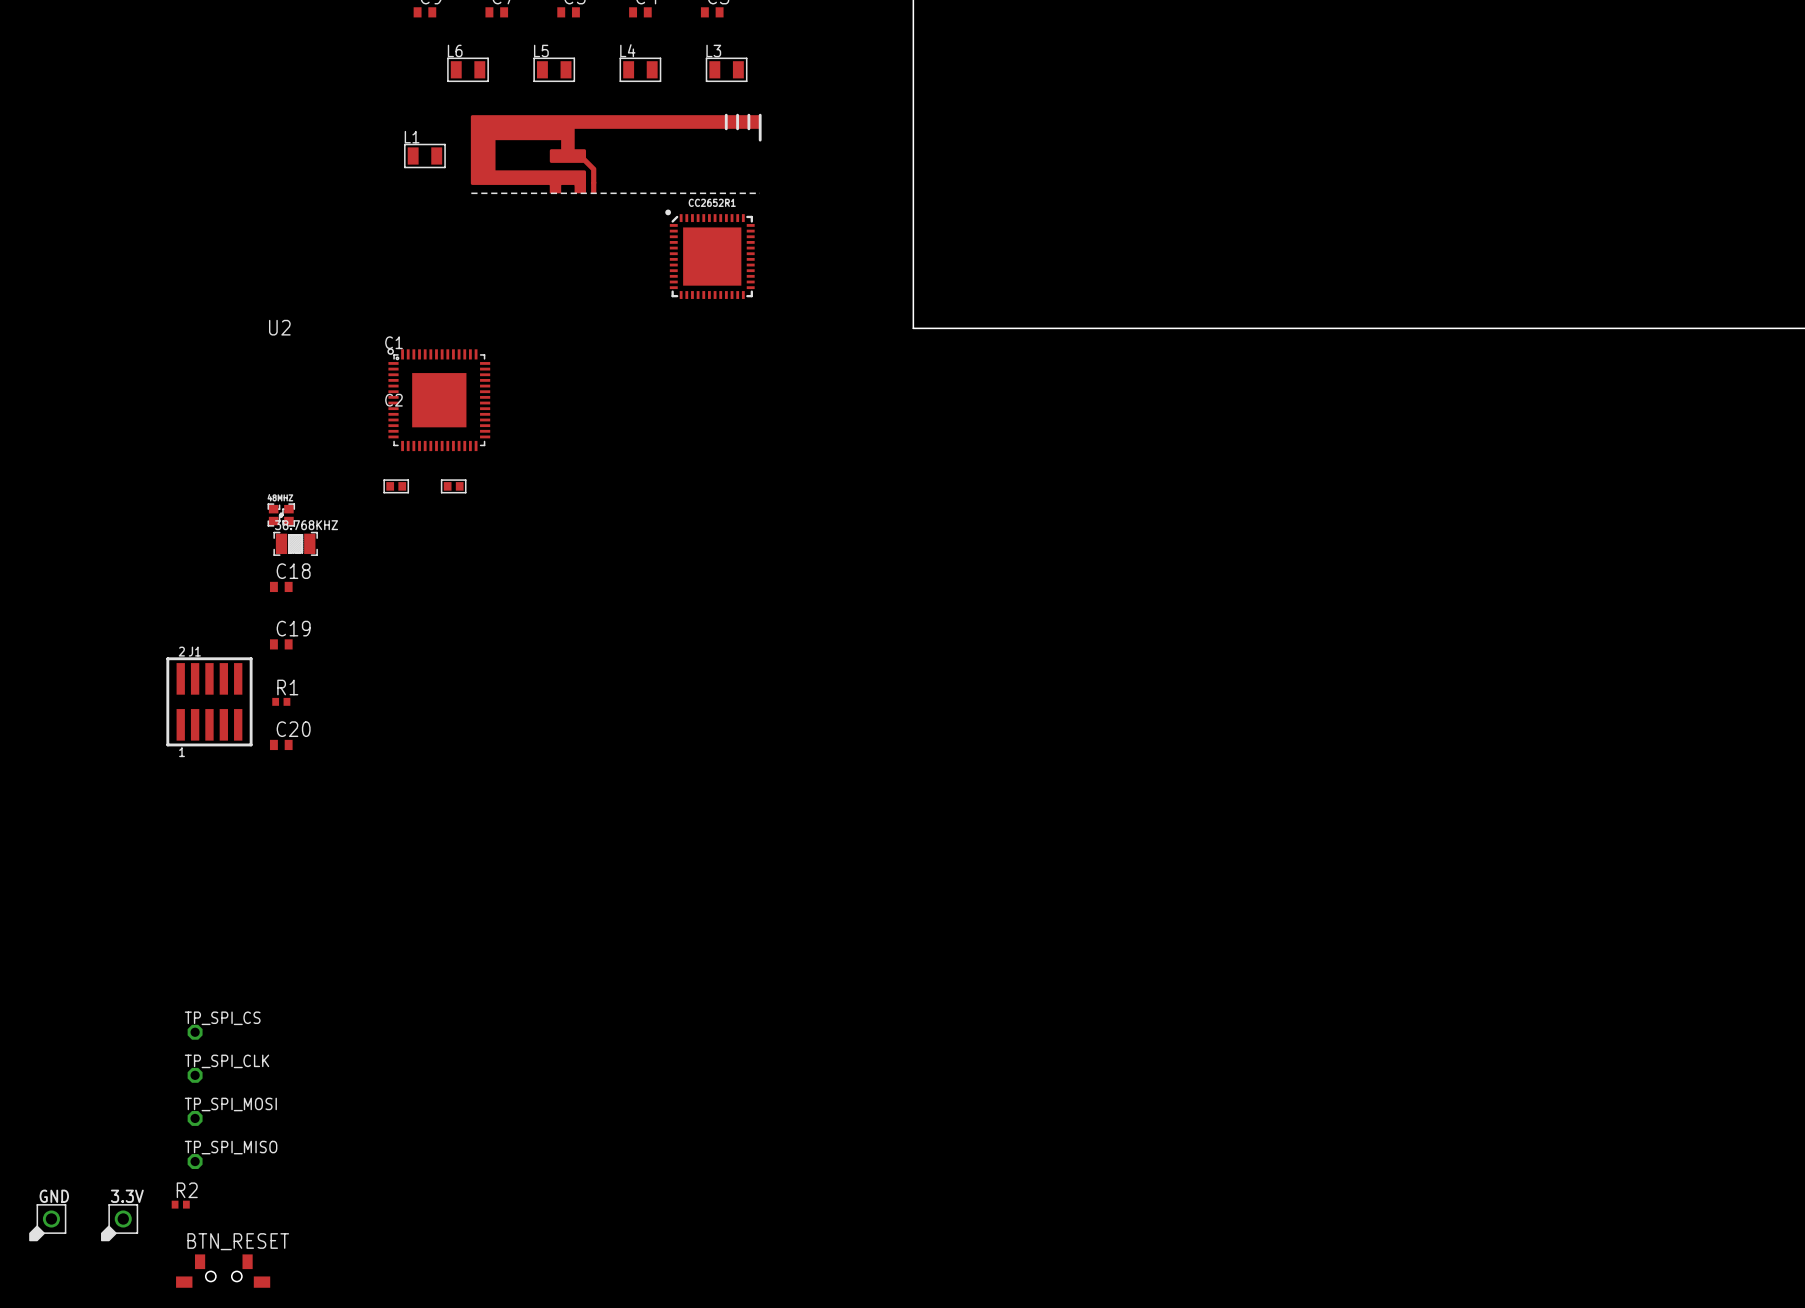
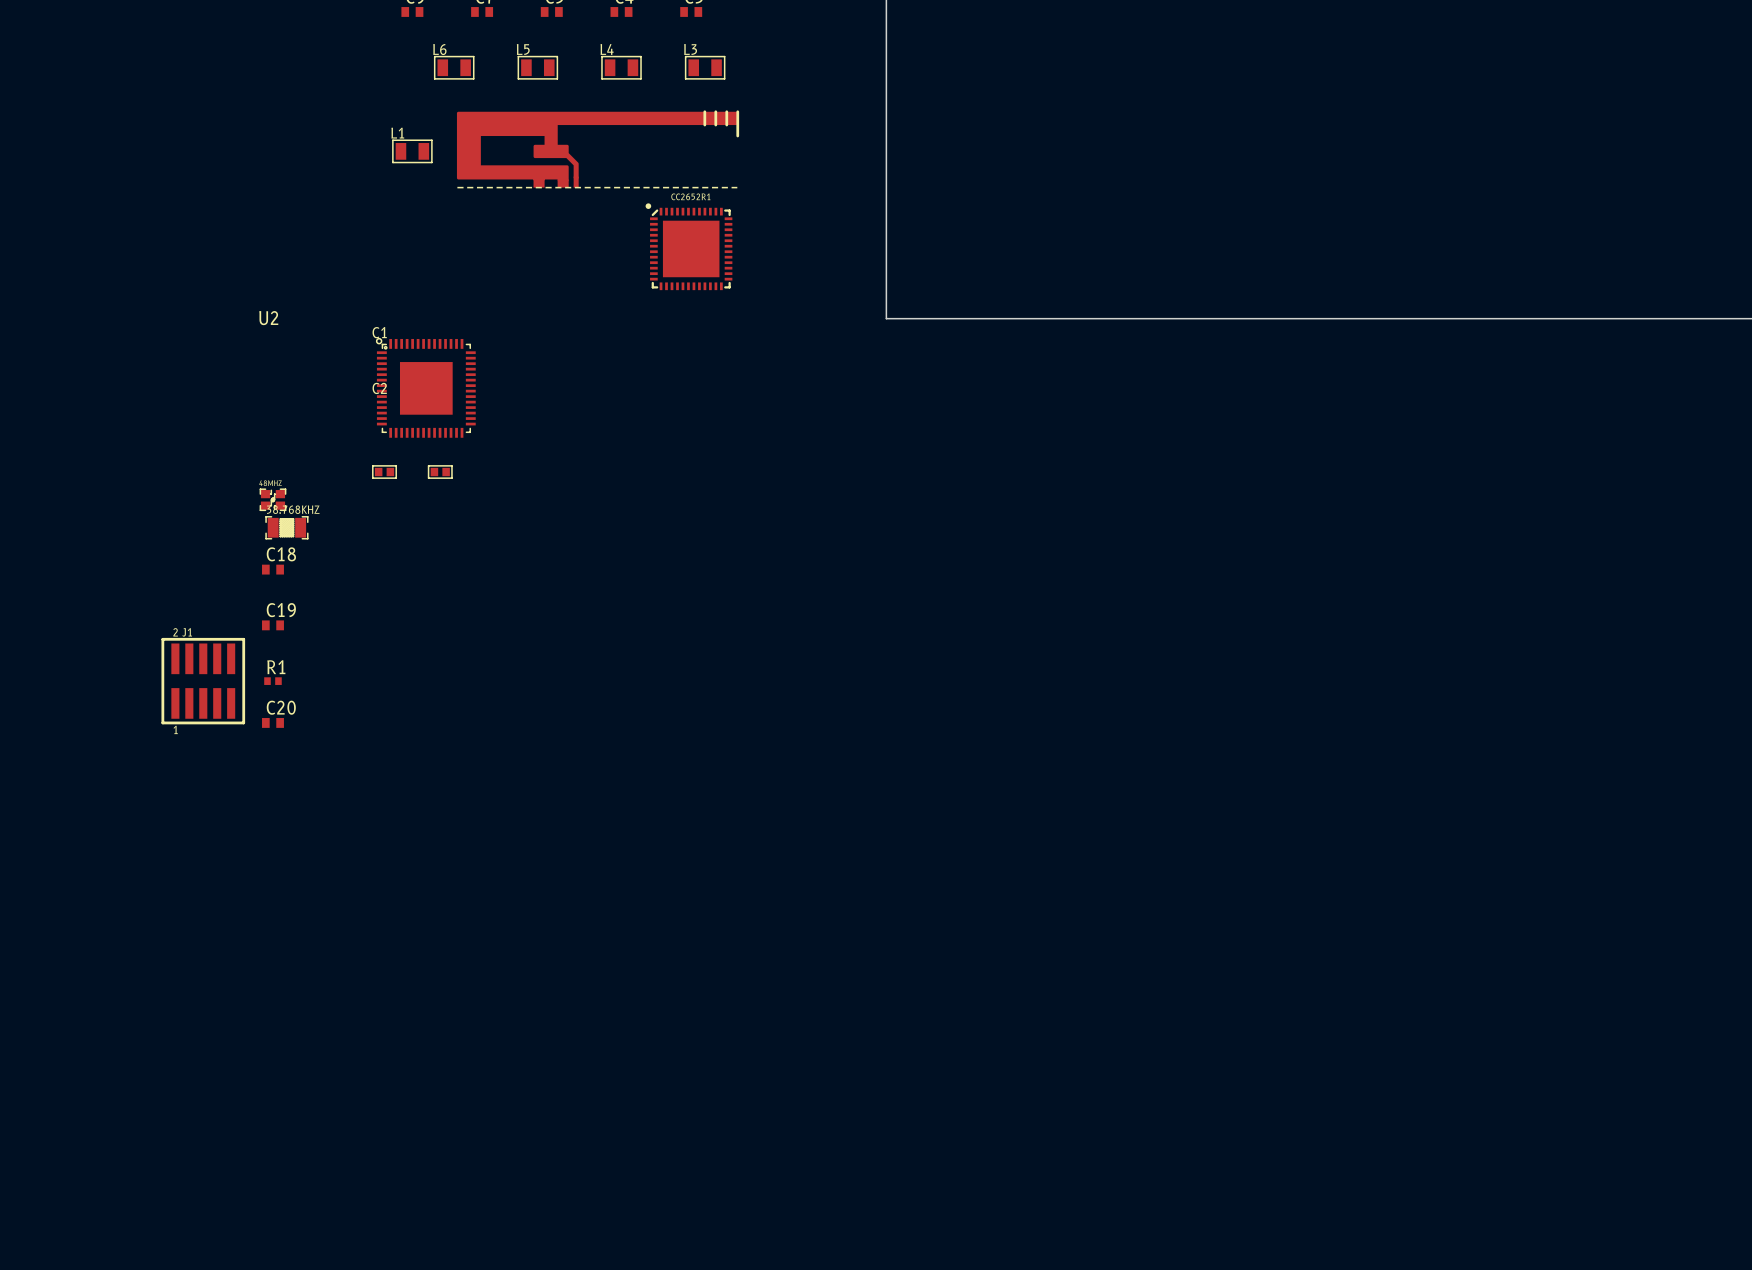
TP_SPI_CS: (195, 1032) -> none
TP_SPI_CLK: (195, 1075) -> none
TP_SPI_MOSI: (195, 1118) -> none
TP_SPI_MISO: (195, 1161) -> none
R2: (180, 1204) -> none
GND: (47, 1222) -> none
3.3V: (119, 1222) -> none
BTN_RESET: (223, 1271) -> none

